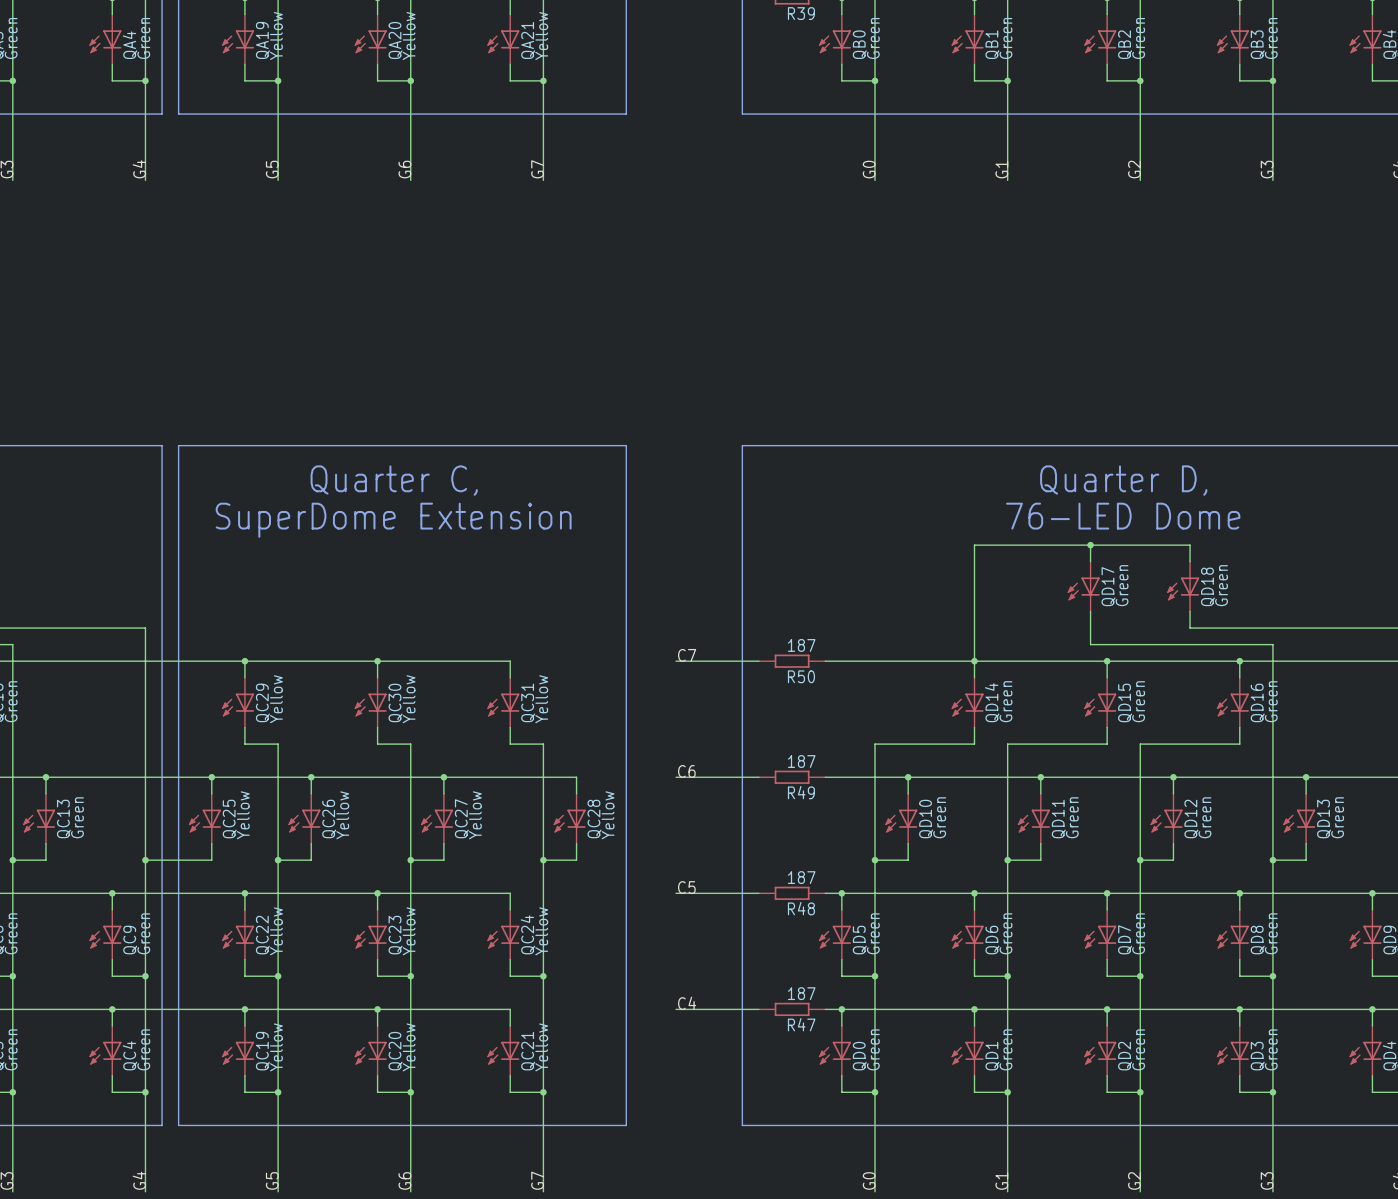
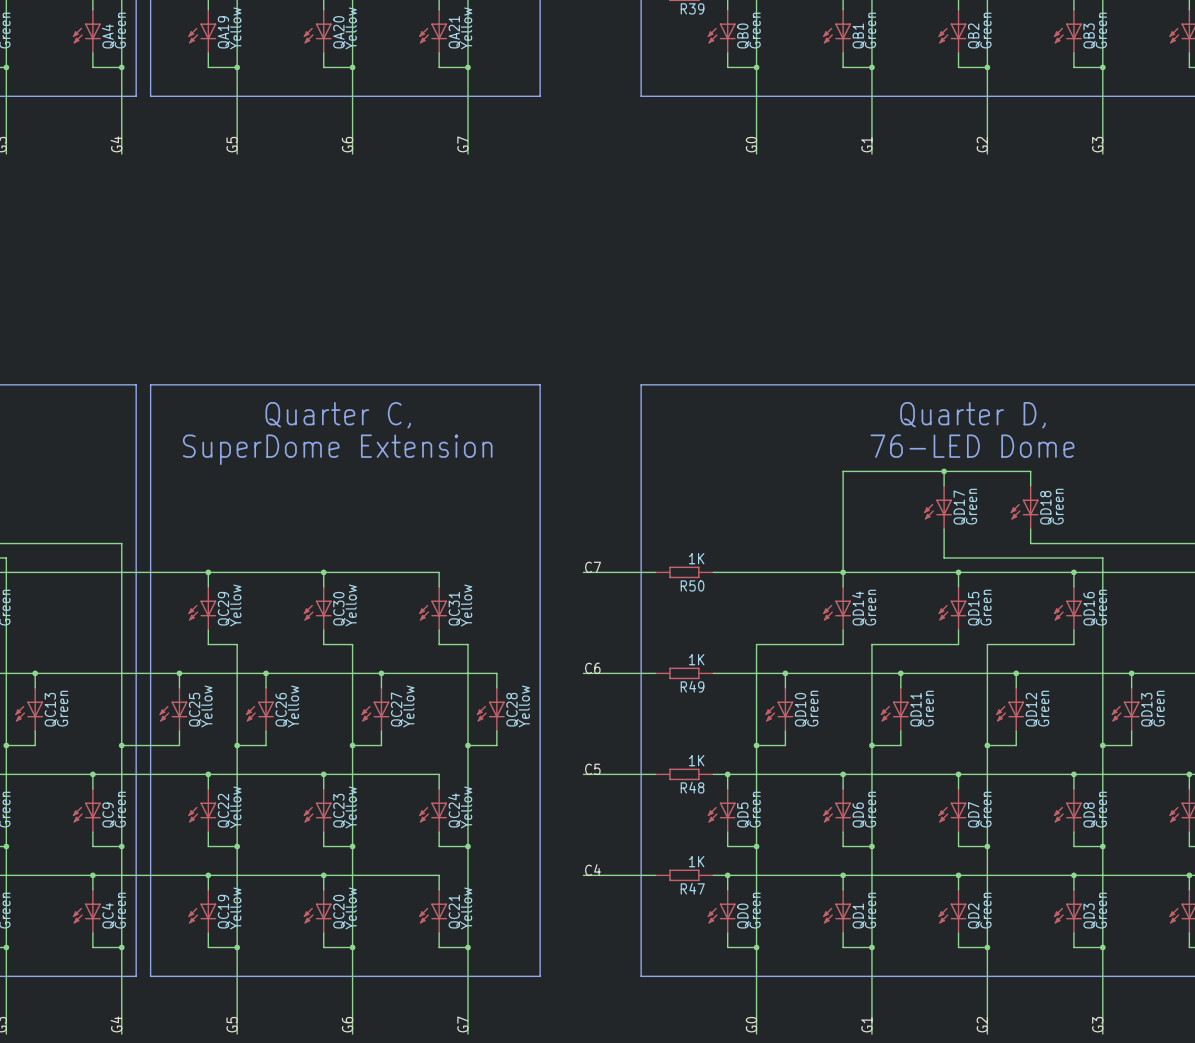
R50 value: 187 (801, 645) -> 1K (696, 558)
R49 value: 187 (801, 761) -> 1K (696, 659)
R48 value: 187 (801, 877) -> 1K (696, 760)
R47 value: 187 (801, 993) -> 1K (696, 861)

